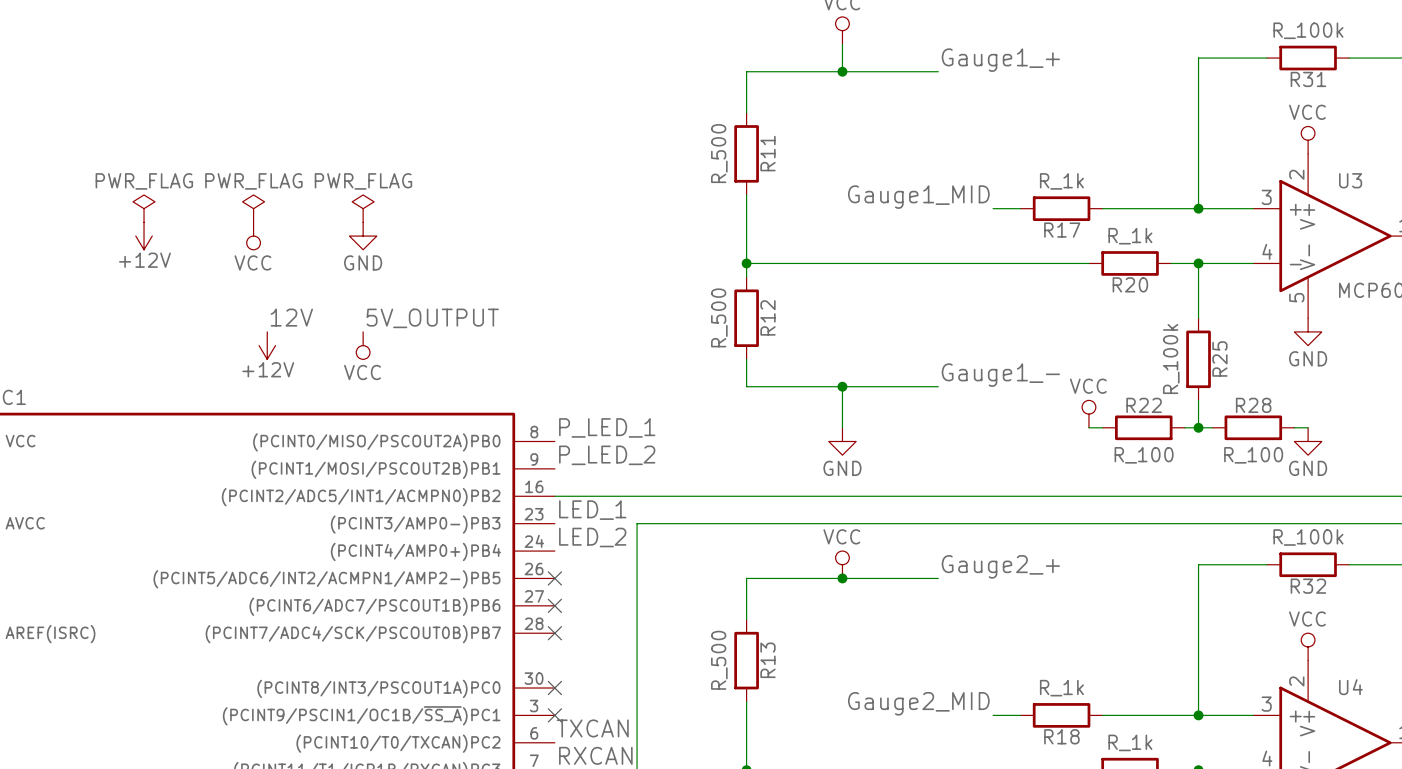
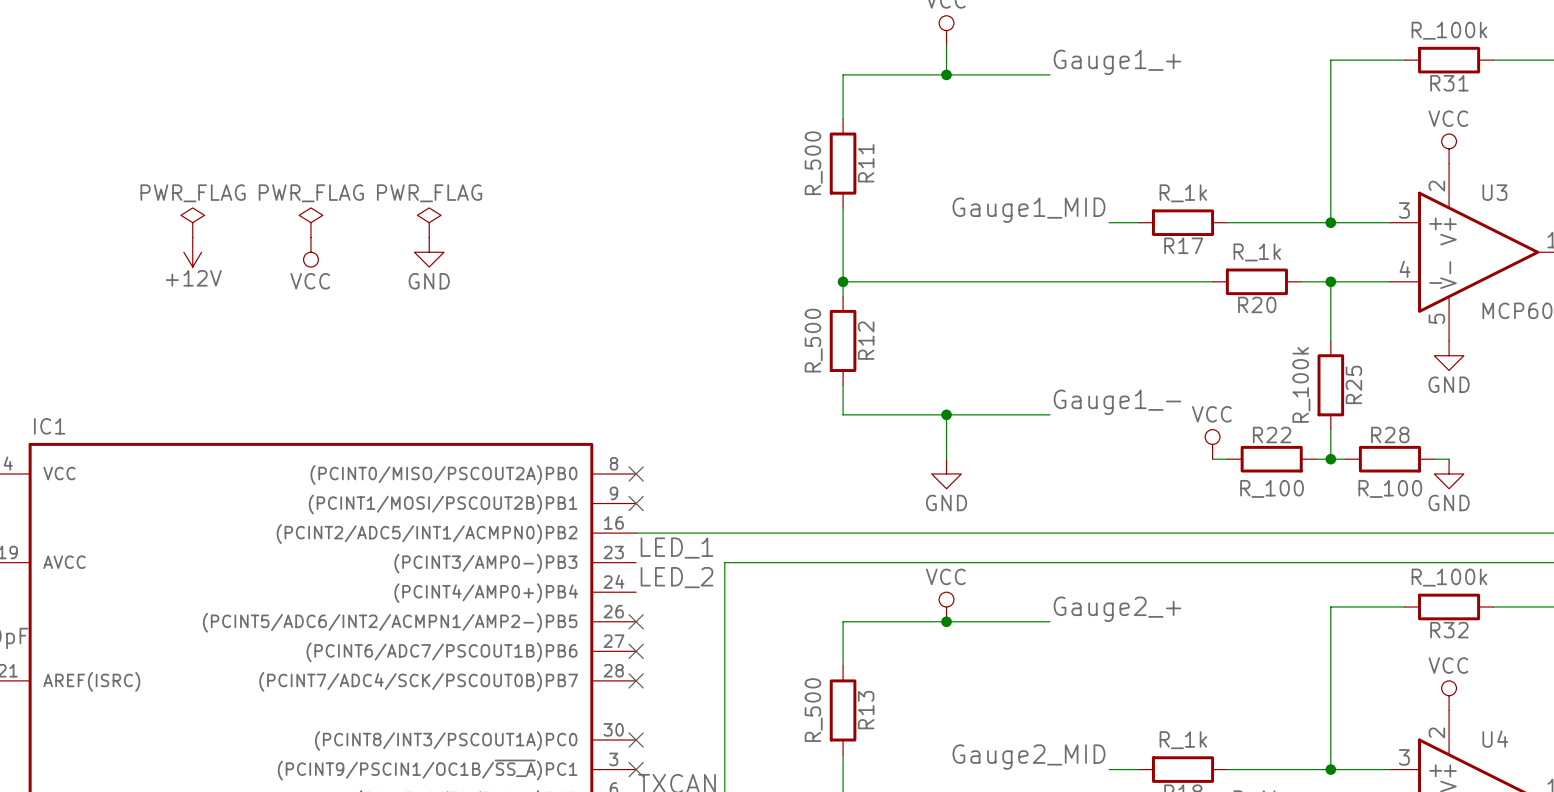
label: 12V (291, 317) -> none
label: 5V_OUTPUT (432, 318) -> none
power symbol: +12V (267, 345) -> none
power symbol: VCC (363, 345) -> none
label: P_LED_1 (607, 427) -> none
no-connect mark: none -> (636, 473)
label: P_LED_2 (607, 455) -> none
no-connect mark: none -> (636, 503)

